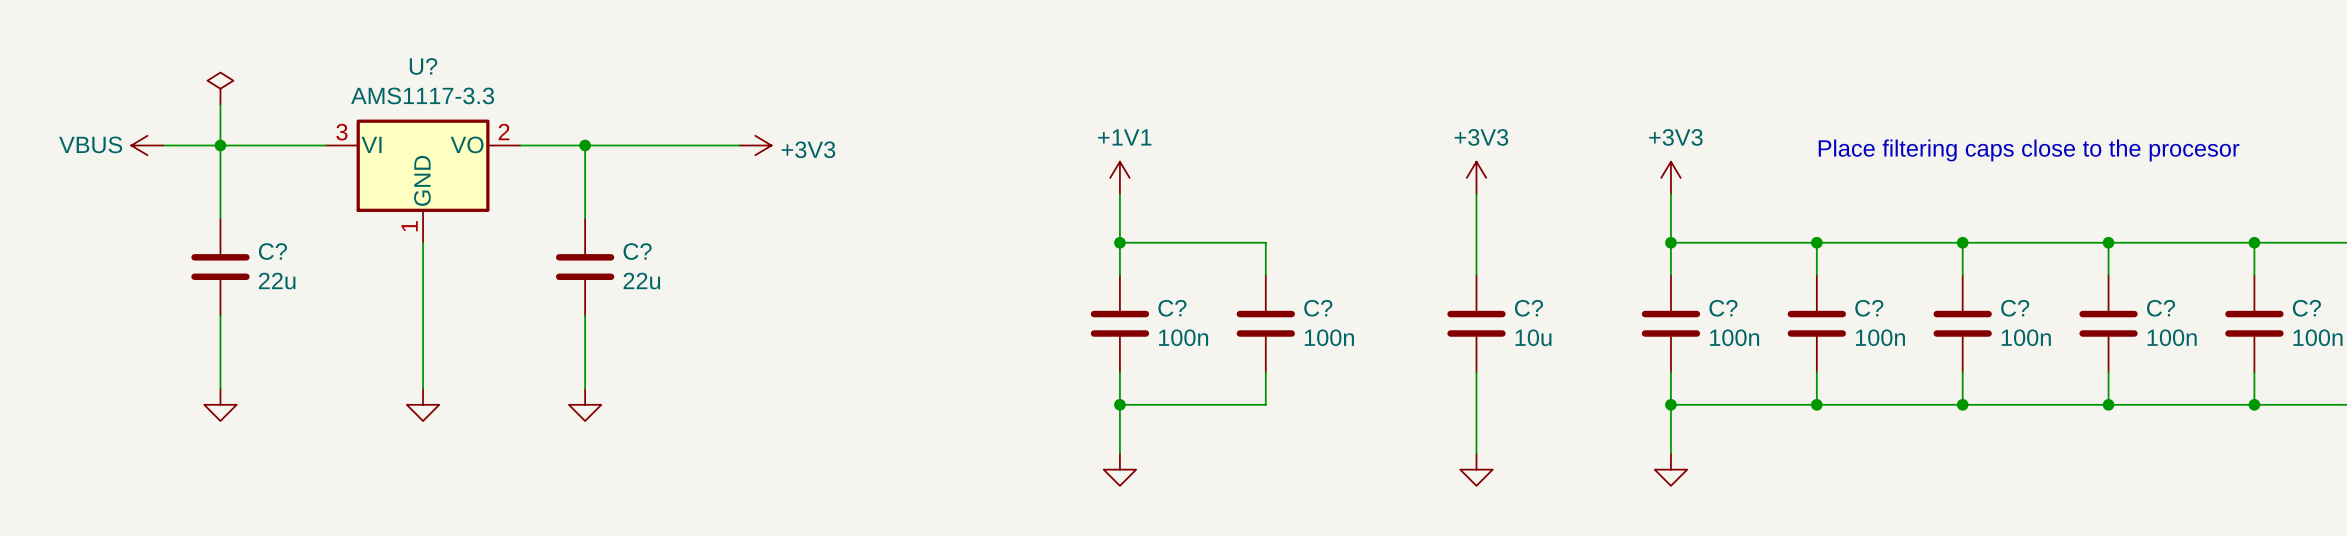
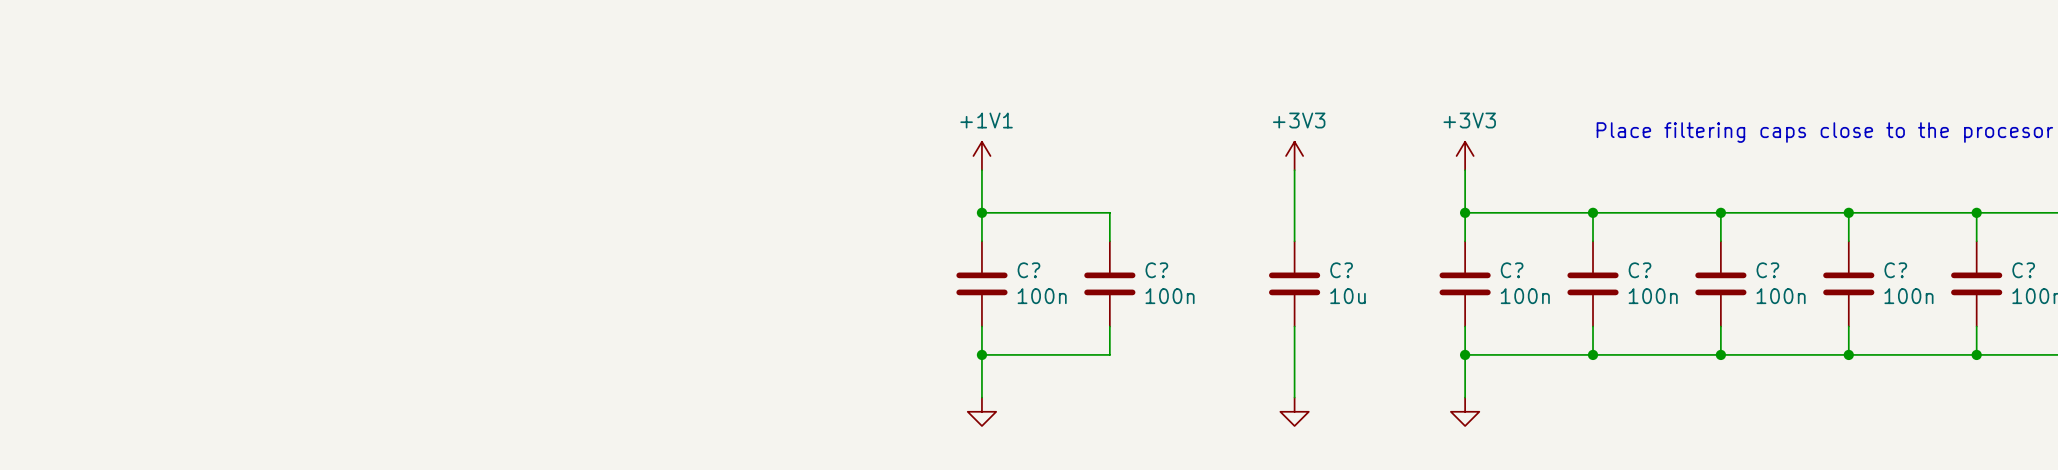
power symbol: (220, 88) -> none
wire: (220, 104) (220, 218) -> none
power symbol: VBUS (147, 145) -> none
wire: (163, 145) (325, 145) -> none
junction: (220, 145) -> none
wire: (520, 145) (739, 145) -> none
wire: (585, 145) (585, 218) -> none
junction: (585, 145) -> none
power symbol: +3V3 (755, 145) -> none
U?: AMS1117-3.3 (423, 181) -> none
wire: (423, 242) (423, 388) -> none
C?: 22u (220, 267) -> none
C?: 22u (585, 267) -> none
wire: (220, 315) (220, 388) -> none
wire: (585, 315) (585, 388) -> none
power symbol: (220, 404) -> none
power symbol: (423, 404) -> none
power symbol: (585, 404) -> none

